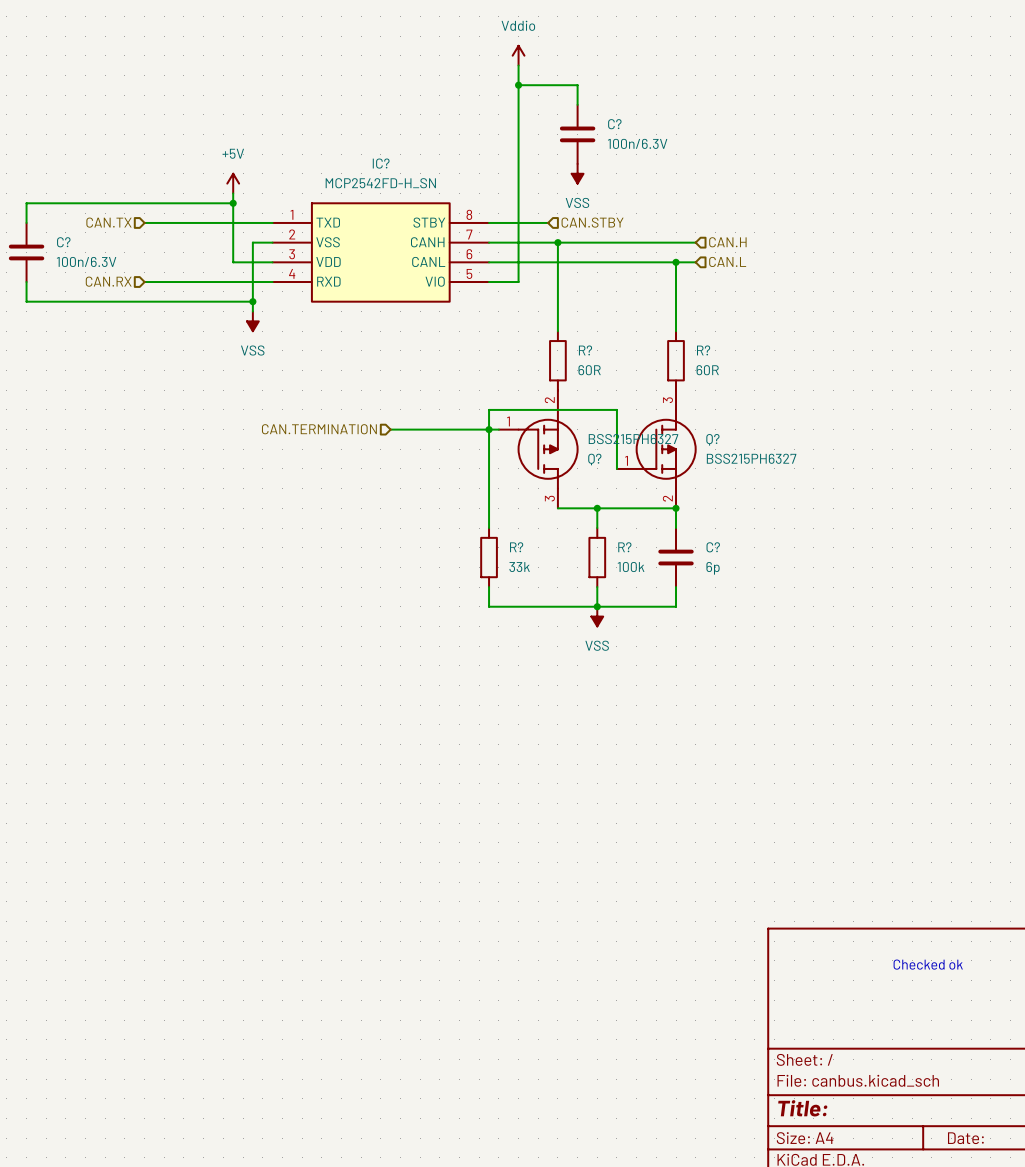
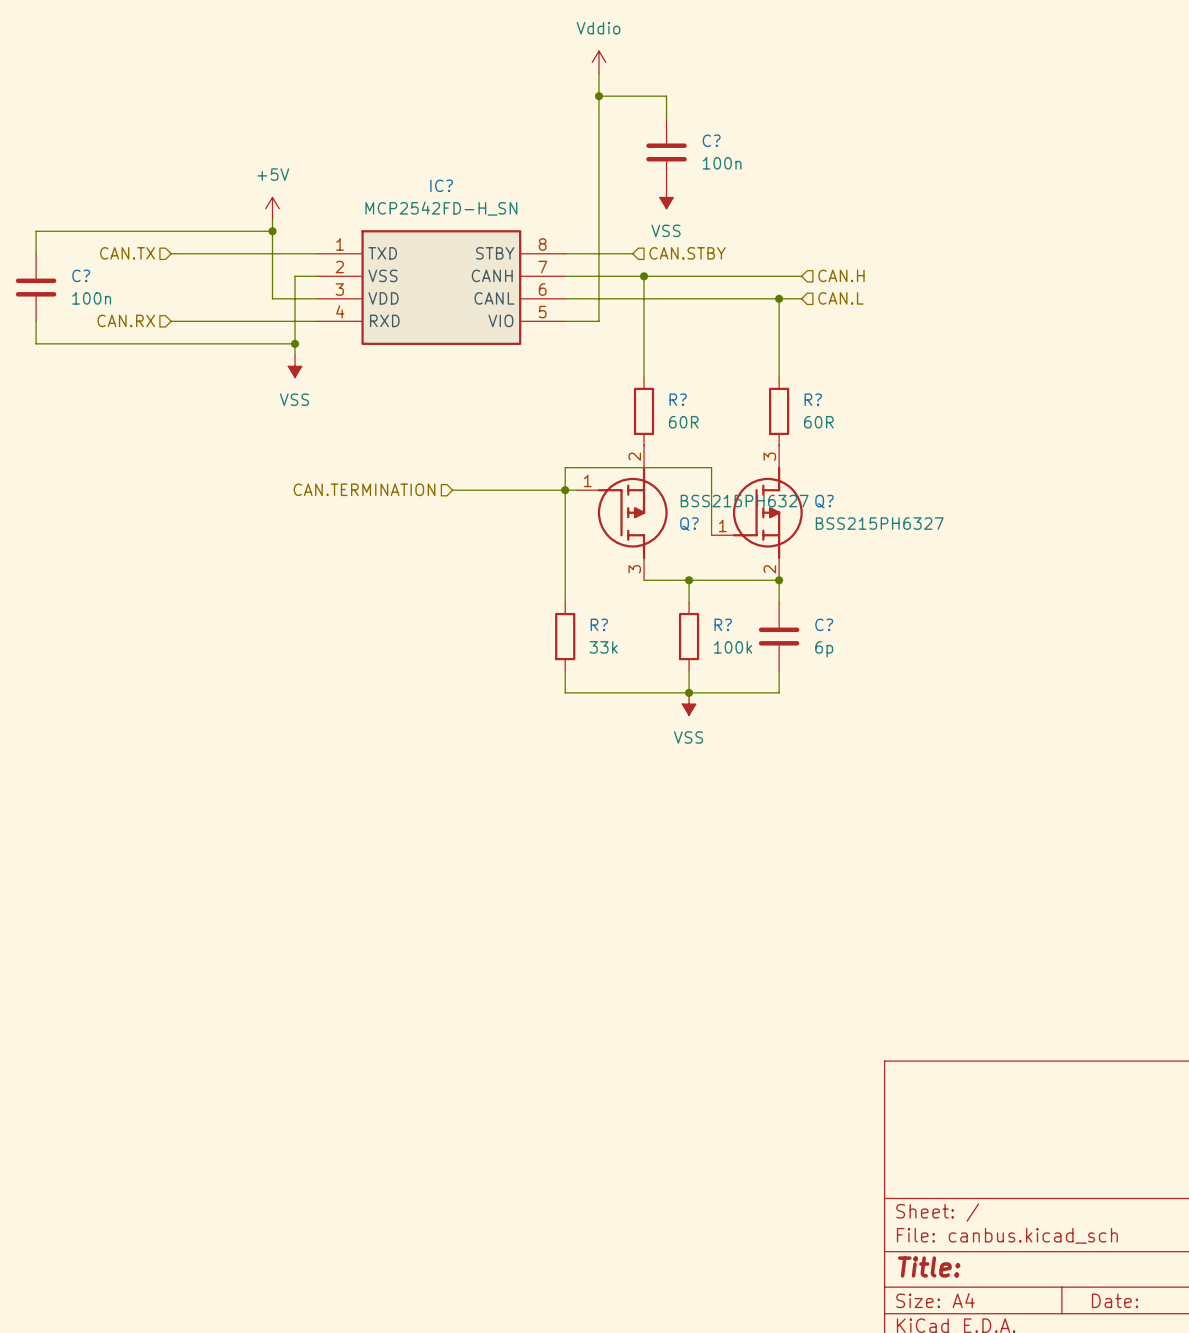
C? value: 100n/6.3V (637, 143) -> 100n (722, 163)
C? value: 100n/6.3V (86, 261) -> 100n (91, 298)
text: Checked ok (928, 964) -> none

